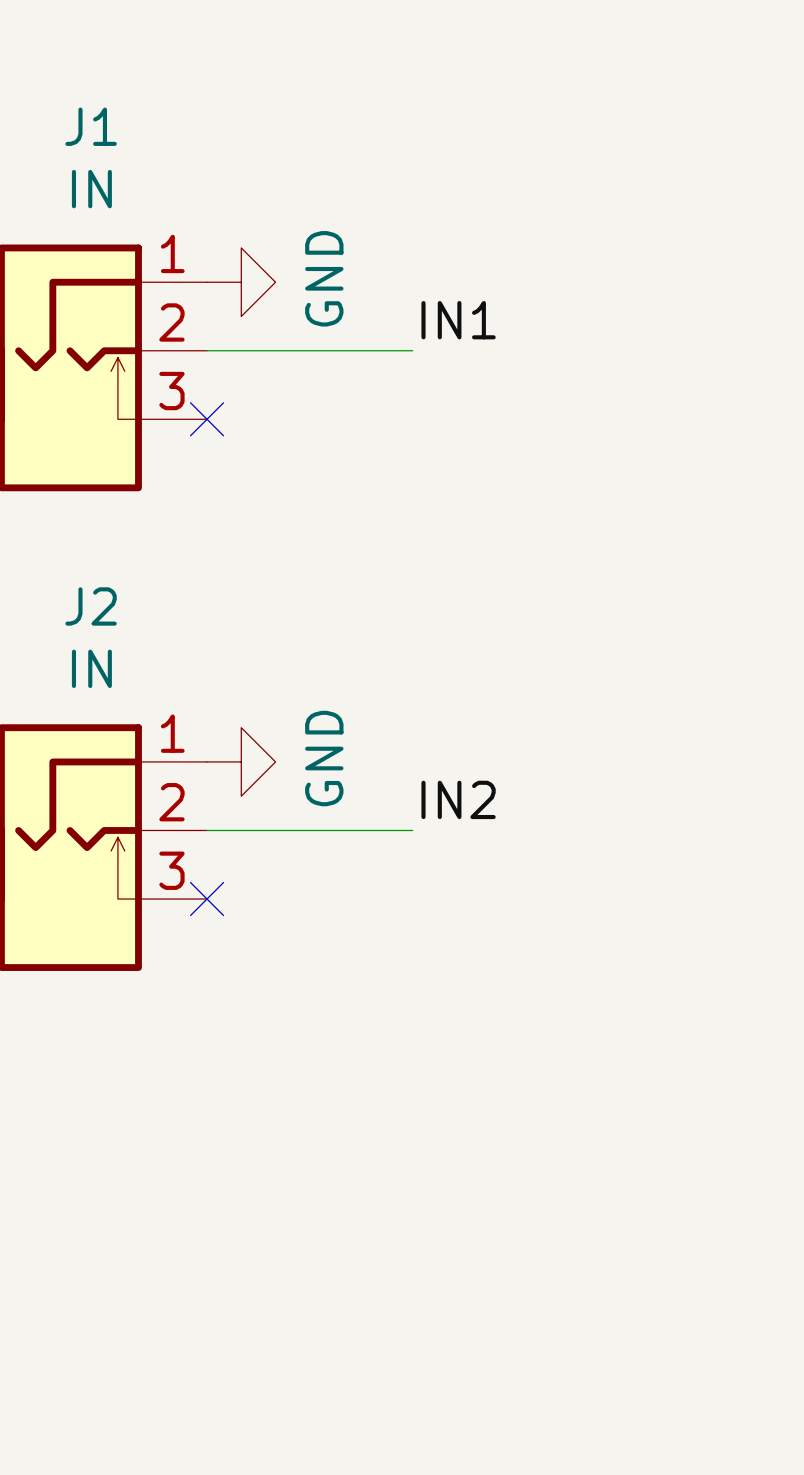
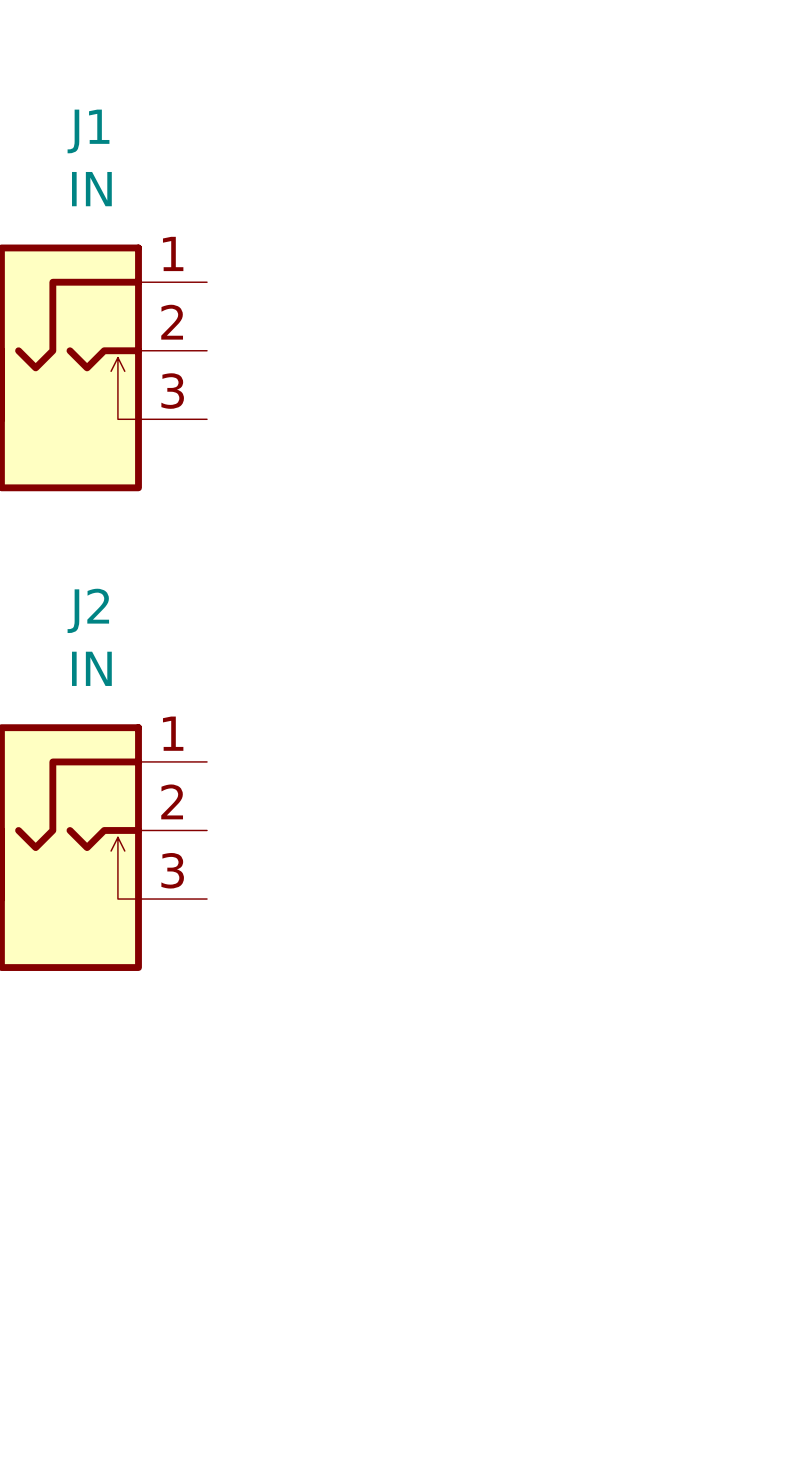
power symbol: GND (241, 282) -> none
label: IN1 (458, 320) -> none
wire: (207, 350) (412, 350) -> none
no-connect mark: (207, 419) -> none
power symbol: GND (241, 761) -> none
label: IN2 (458, 799) -> none
wire: (207, 830) (412, 830) -> none
no-connect mark: (207, 899) -> none

